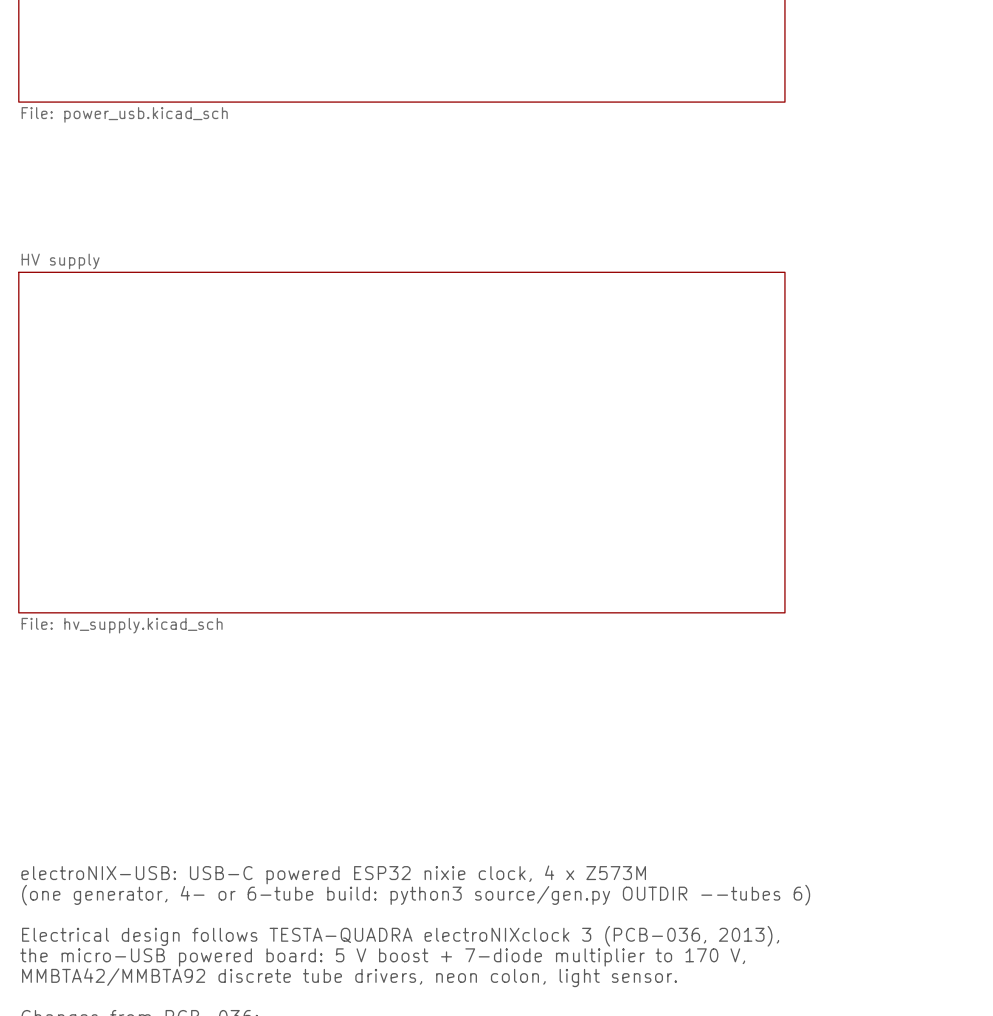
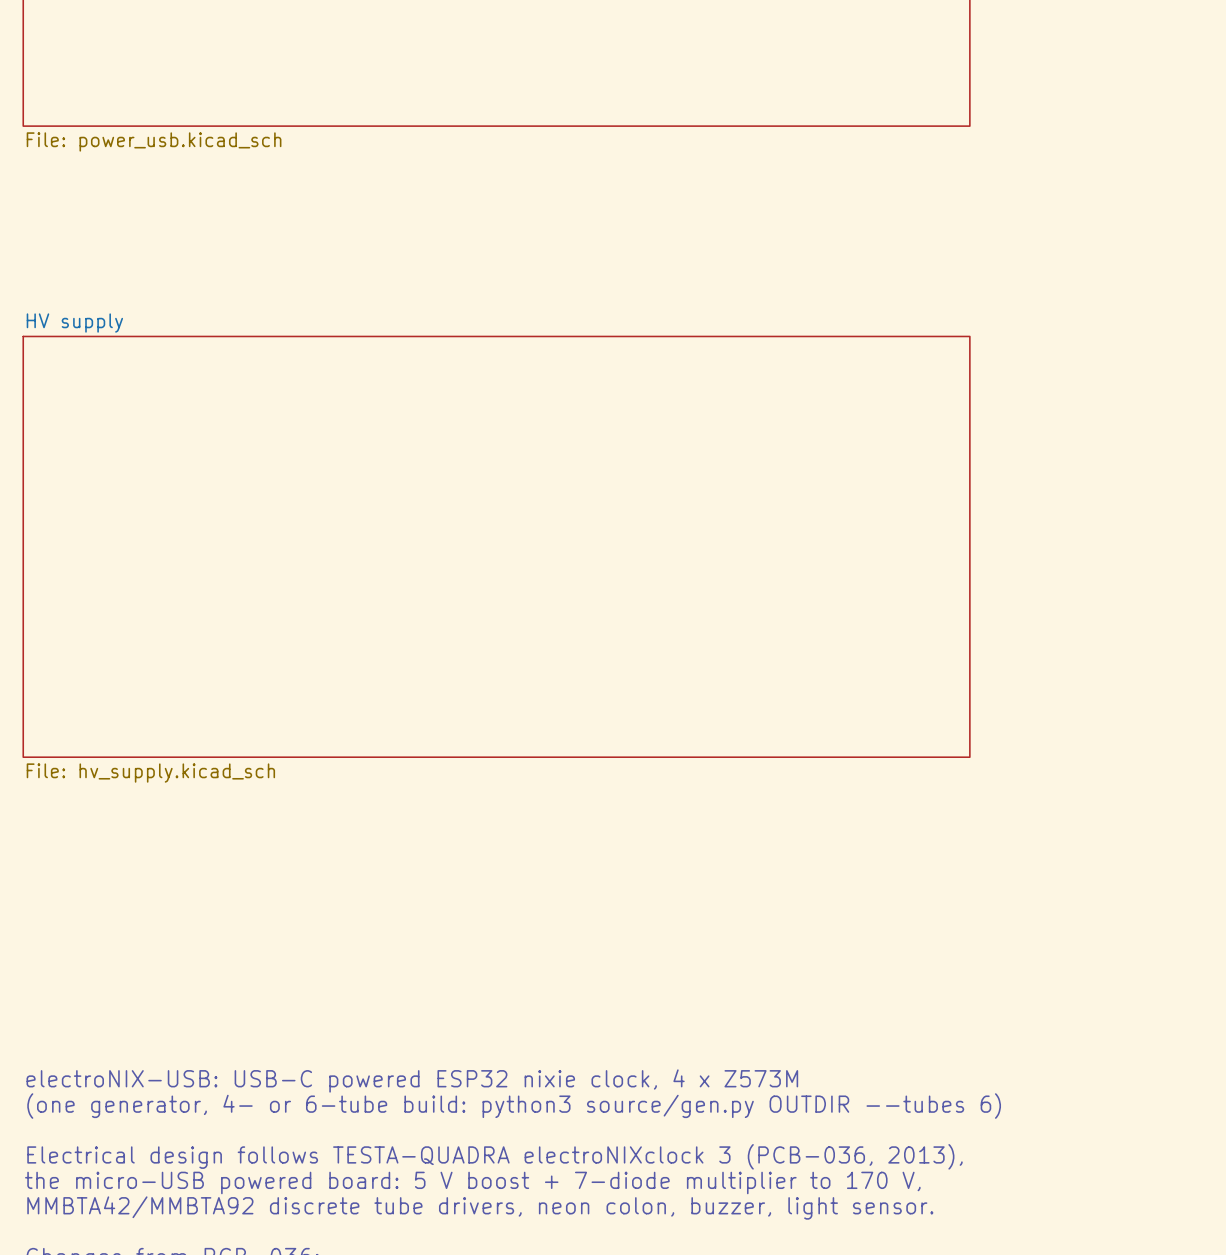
text: MMBTA42/MMBTA92 discrete tube drivers, neon colon, light sensor. (349, 977) -> MMBTA42/MMBTA92 discrete tube drivers, neon colon, buzzer, light sensor. (480, 1208)

